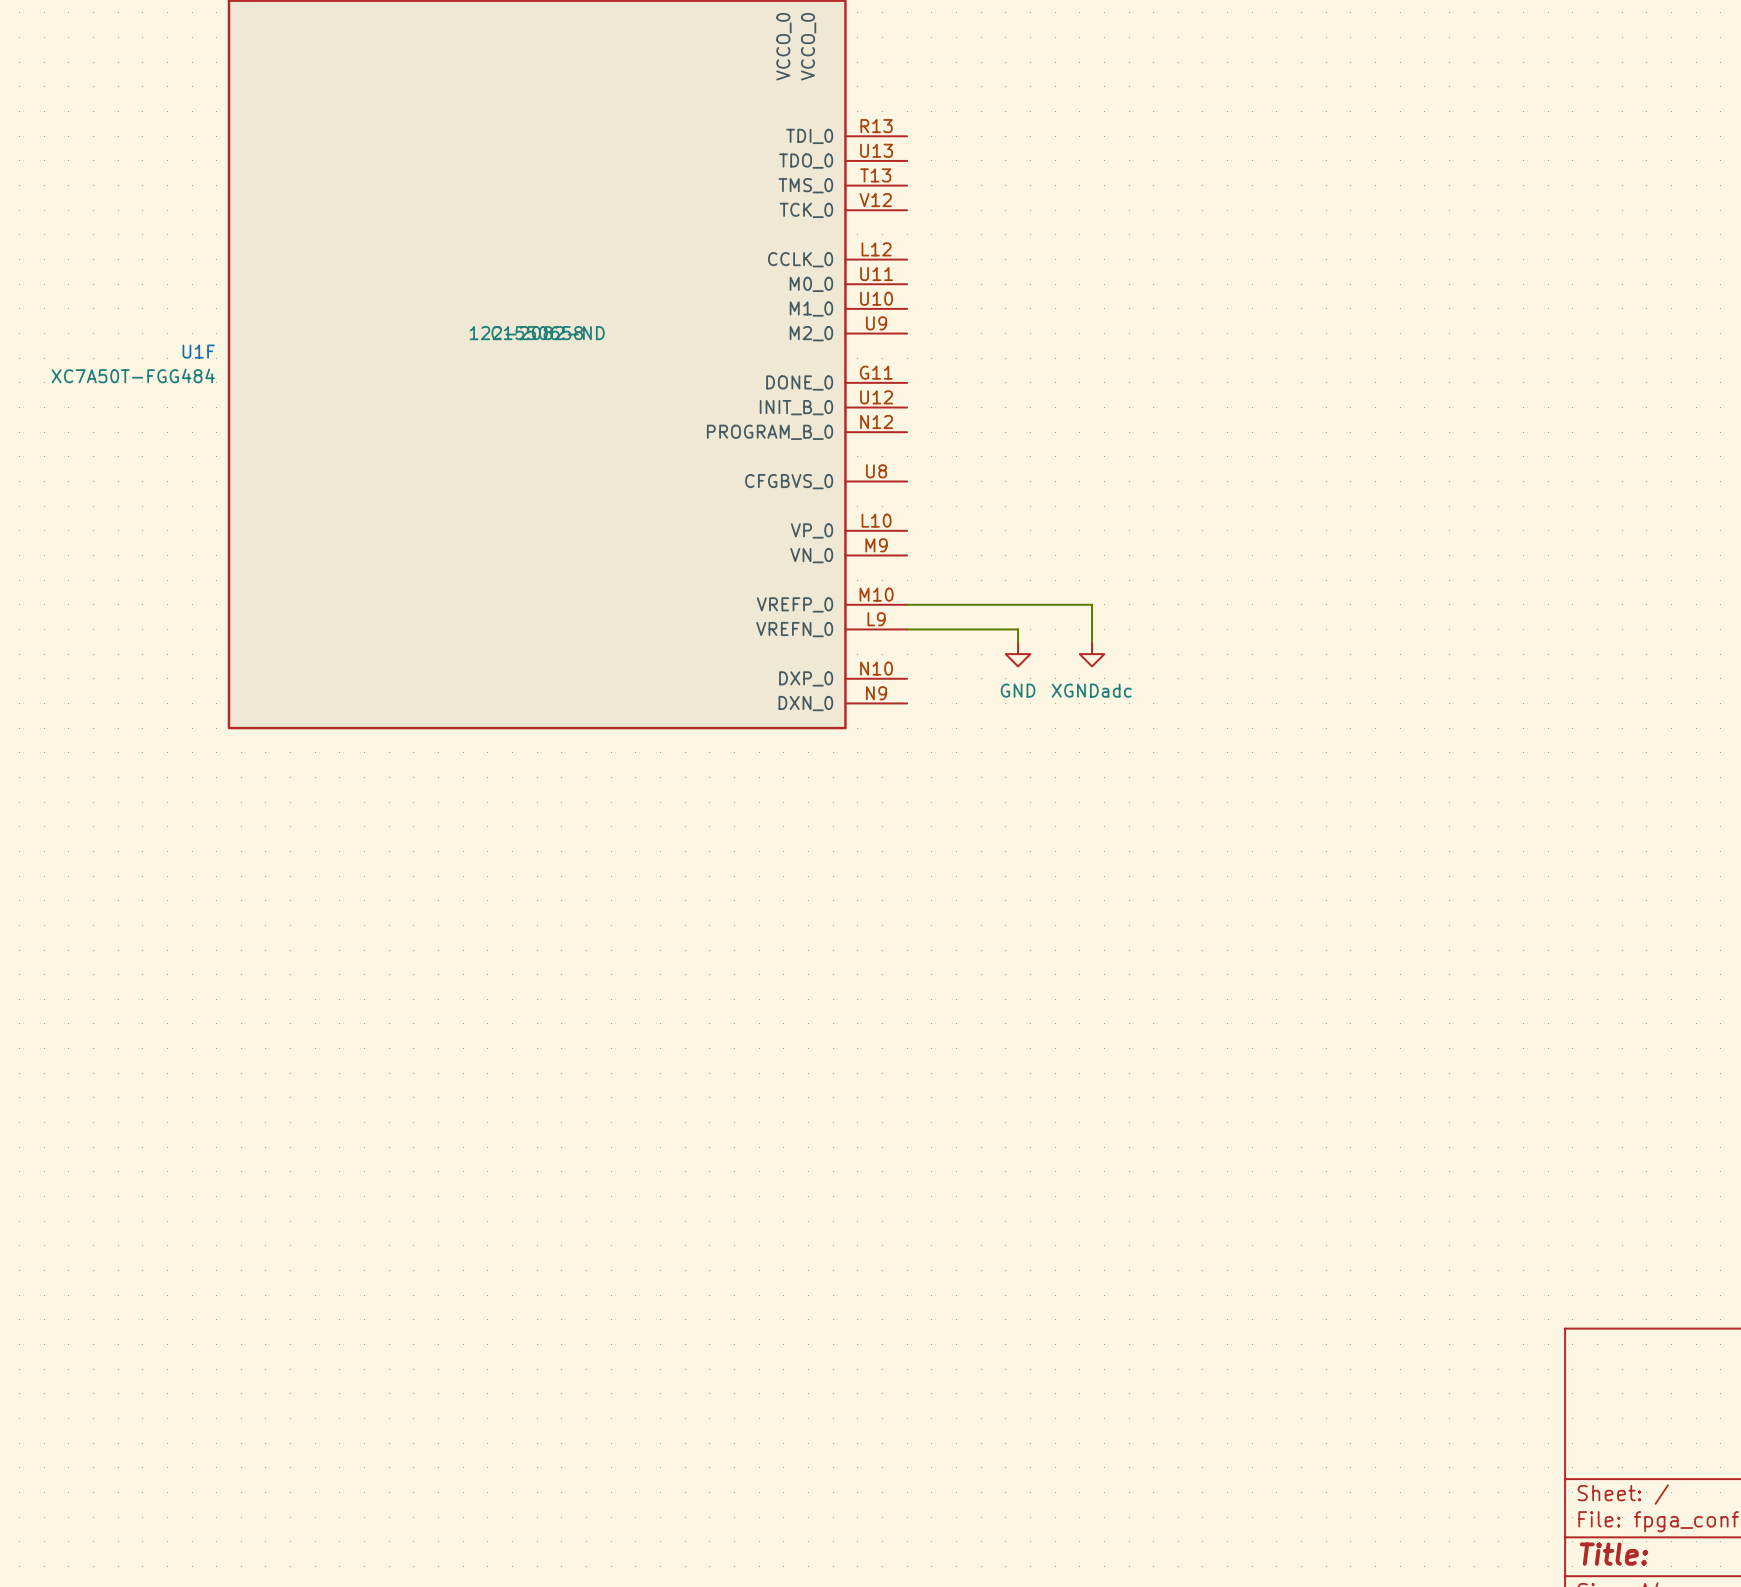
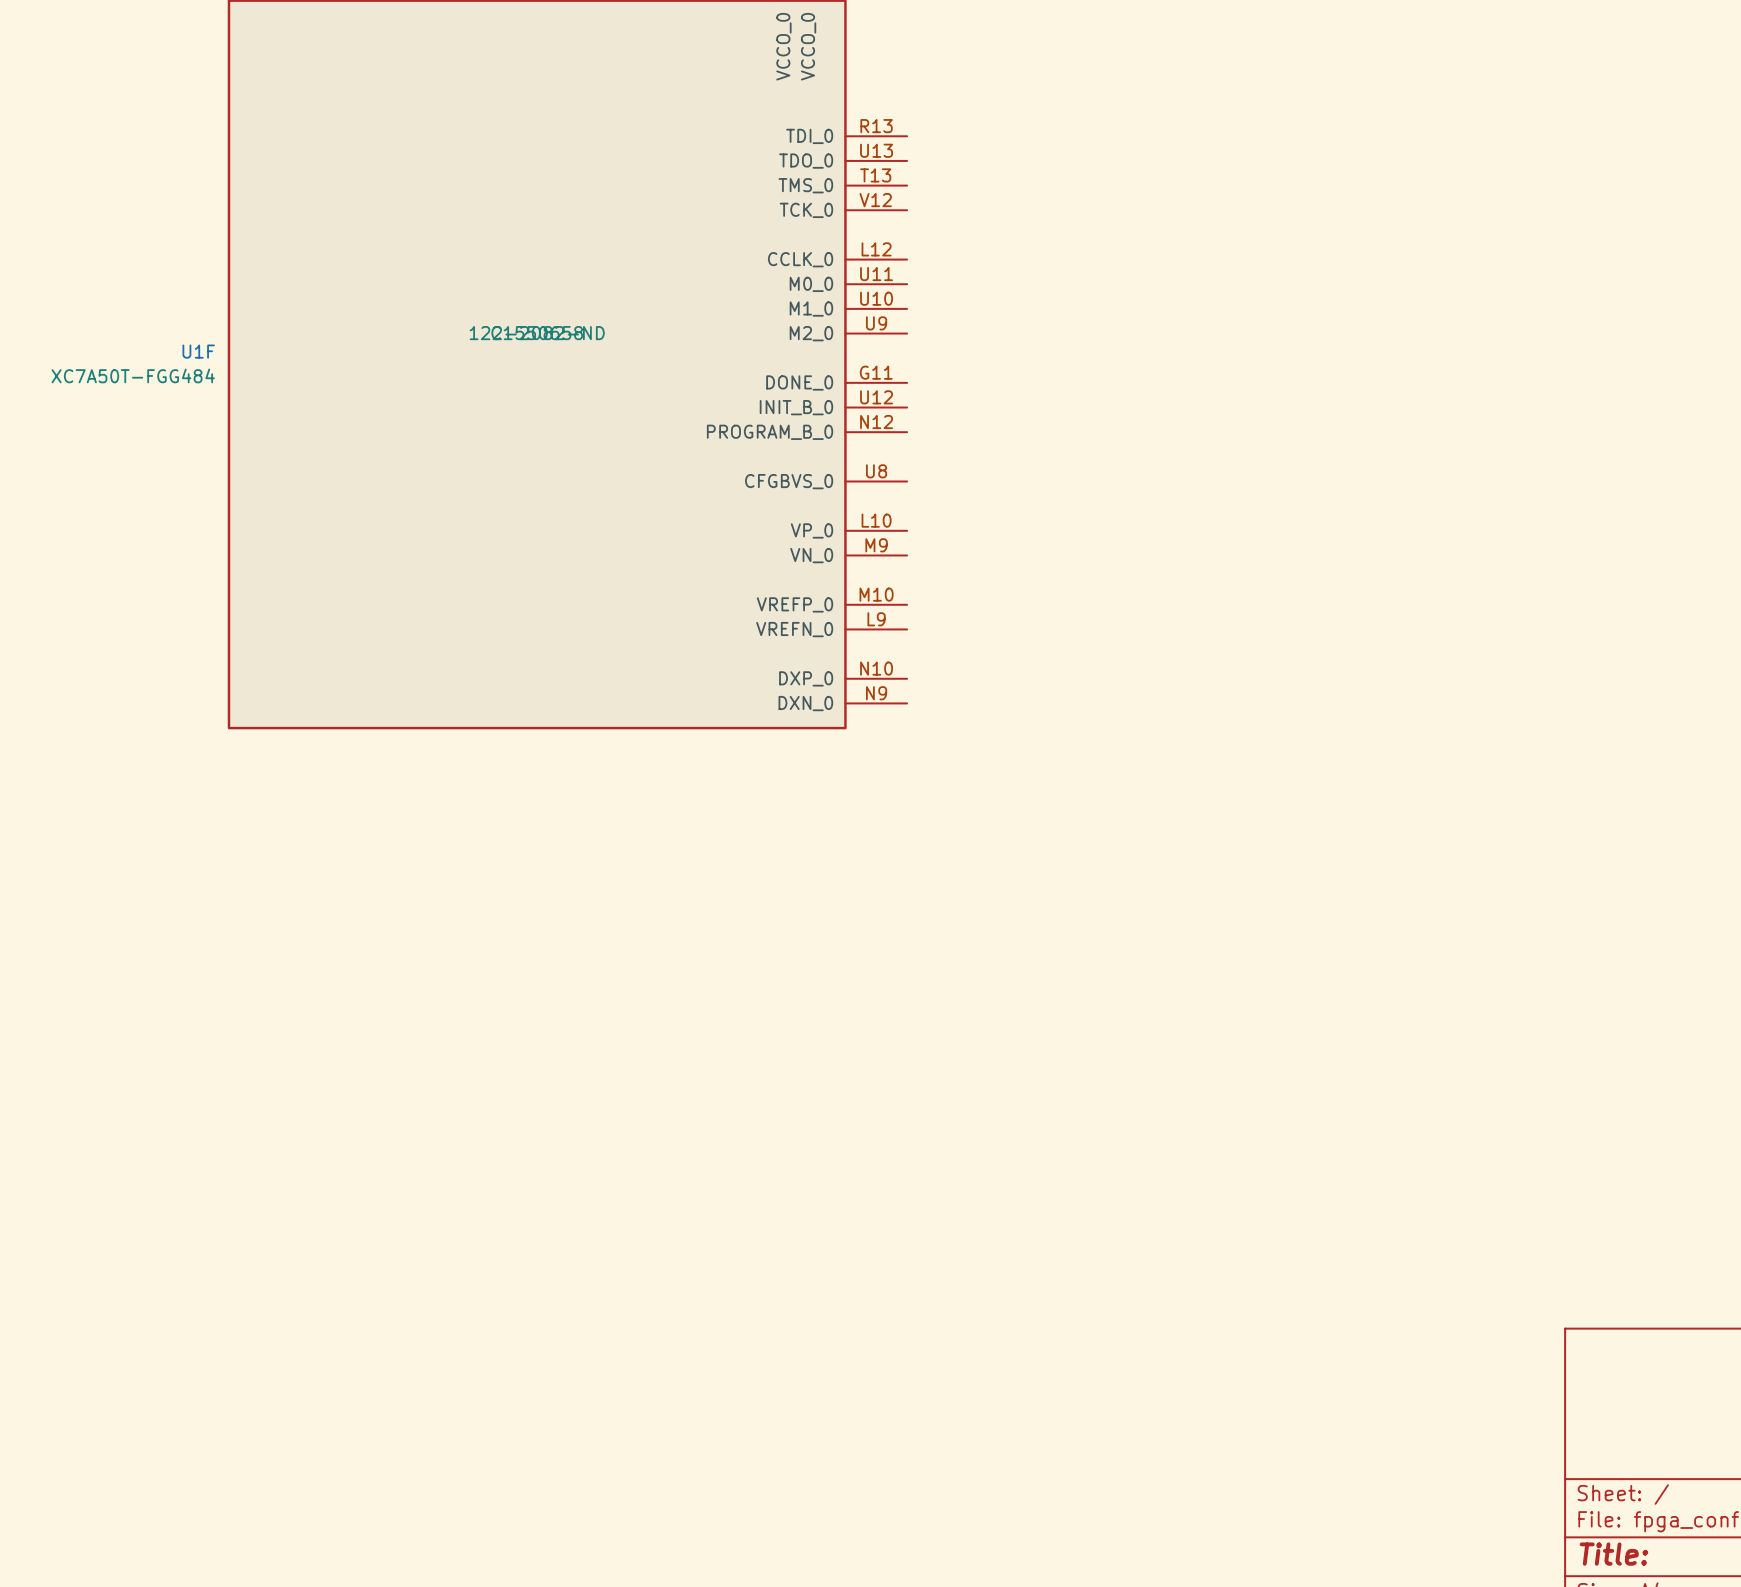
wire: (907, 604) (1092, 604) (1092, 641) -> none
wire: (907, 629) (1018, 629) (1018, 641) -> none
power symbol: GND (1018, 654) -> none
power symbol: XGNDadc (1092, 654) -> none

